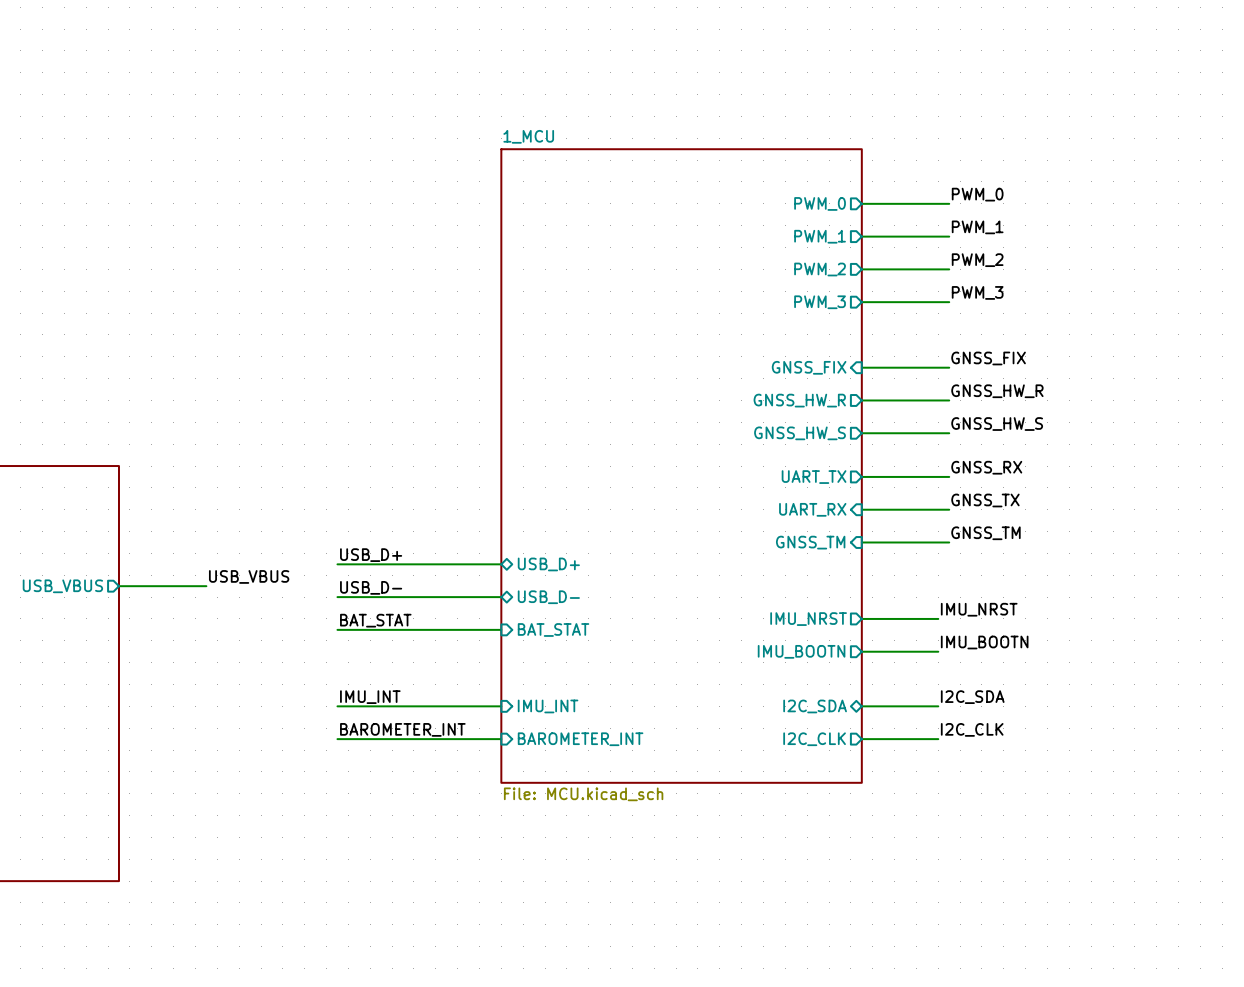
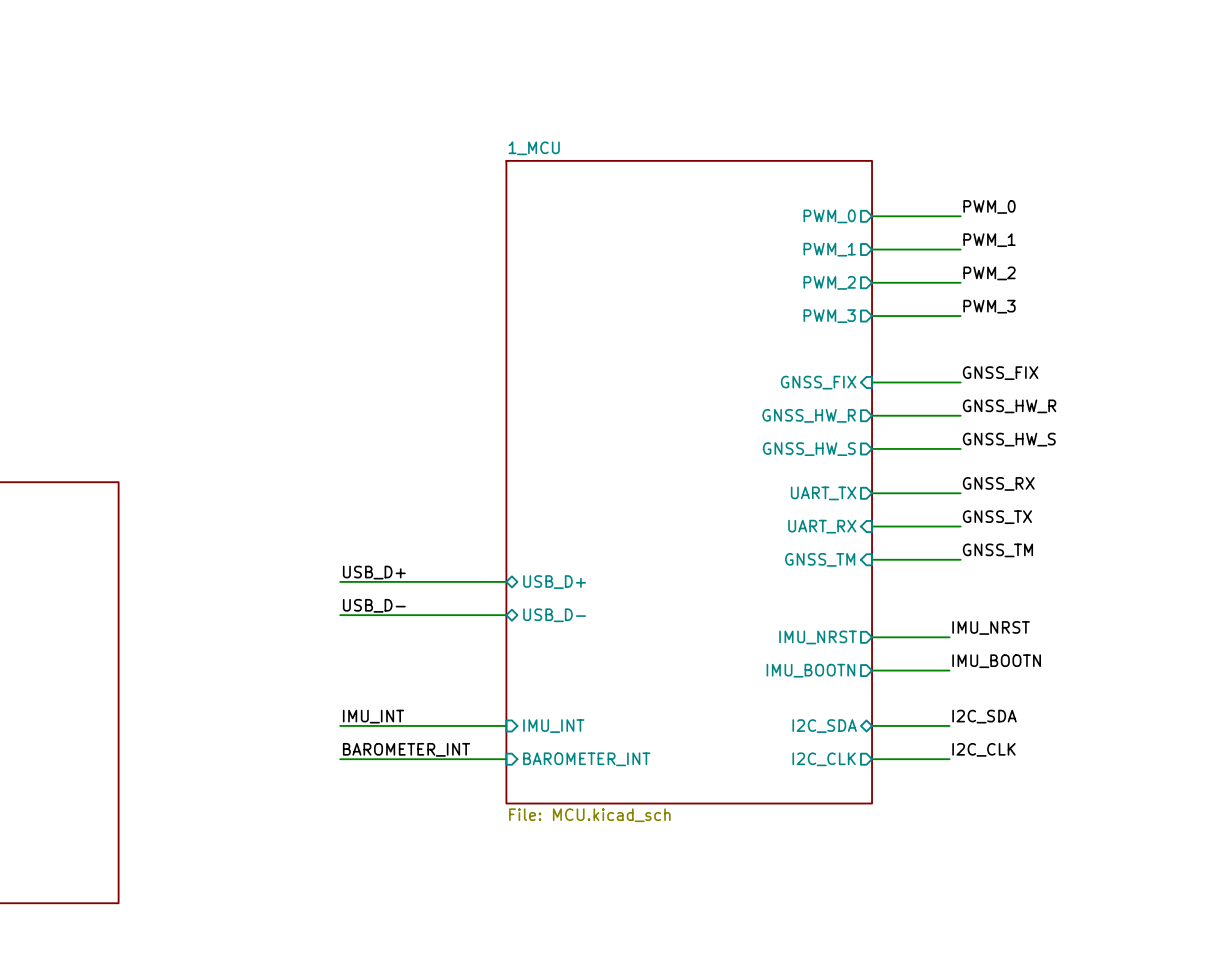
label: USB_VBUS (249, 576) -> none
sheet pin: USB_VBUS (62, 586) -> none
wire: (118, 586) (206, 586) -> none
label: BAT_STAT (375, 620) -> none
wire: (337, 629) (501, 629) -> none
sheet pin: BAT_STAT (553, 629) -> none

